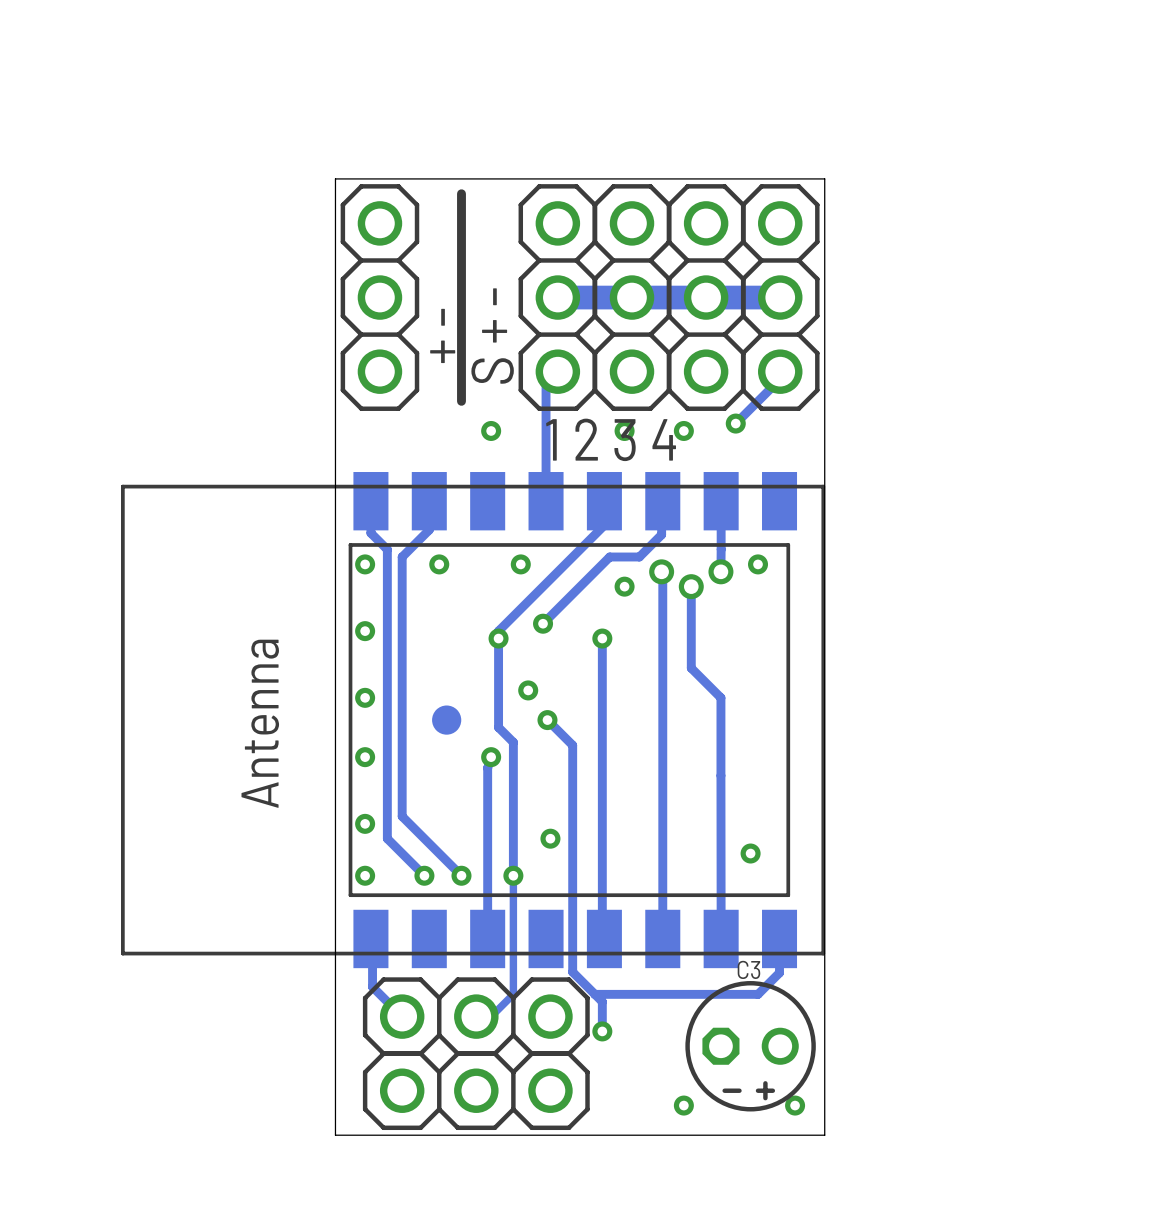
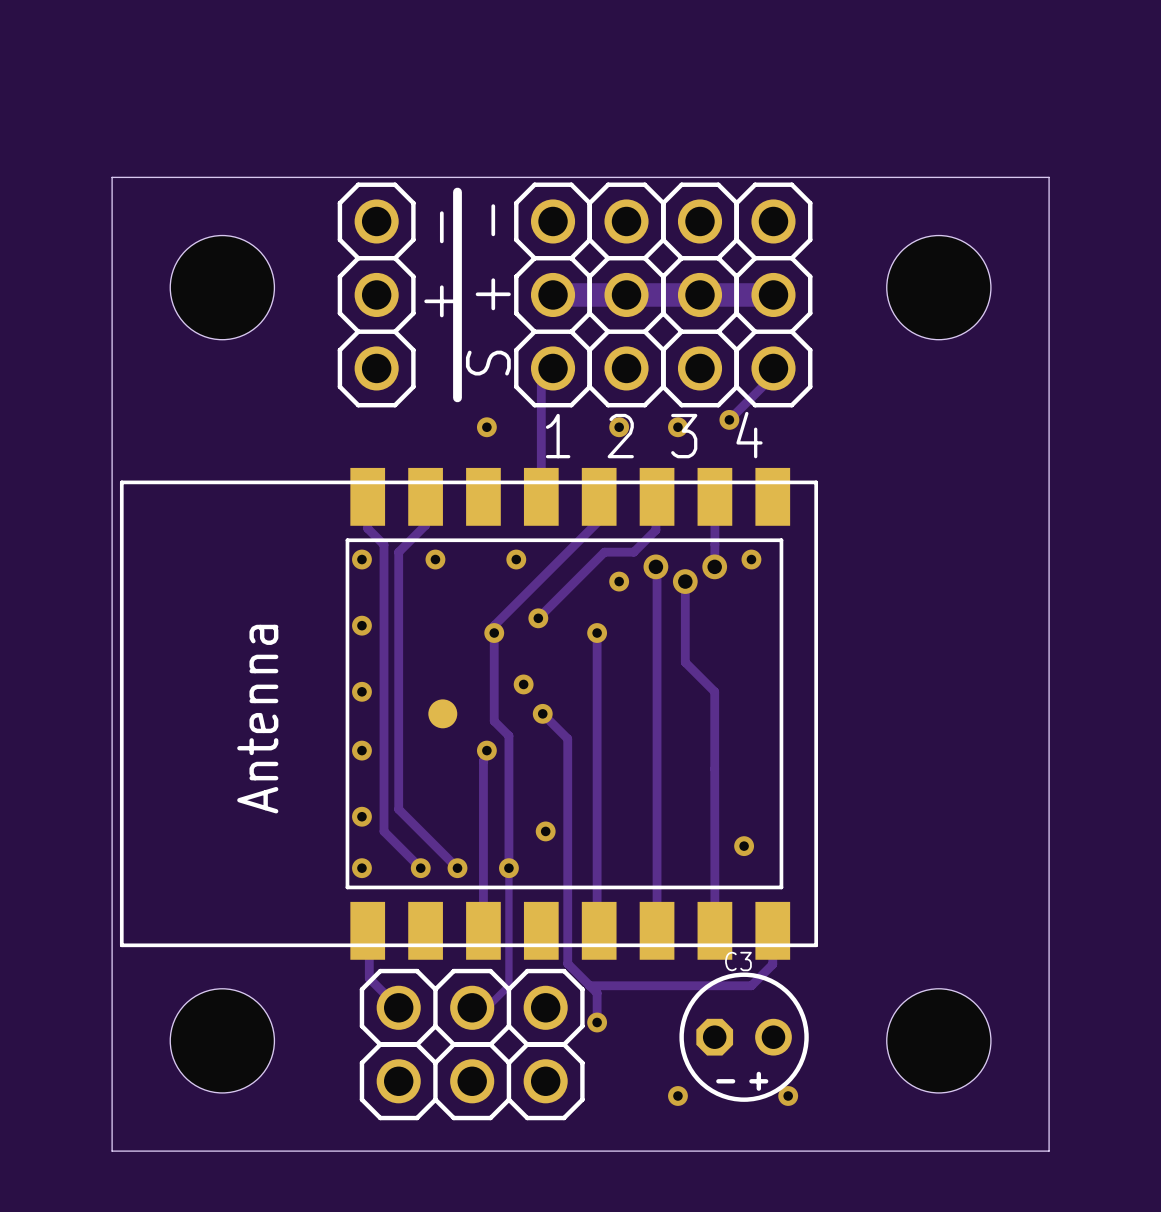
board edge: (824, 178) (824, 1135) (335, 1135) (335, 178) -> (817, 177) (1049, 177) (1049, 1151) (112, 1151) (112, 177) (332, 177)
part: none -> (222, 287)
part: none -> (938, 287)
part: none -> (222, 1040)
part: none -> (938, 1040)

